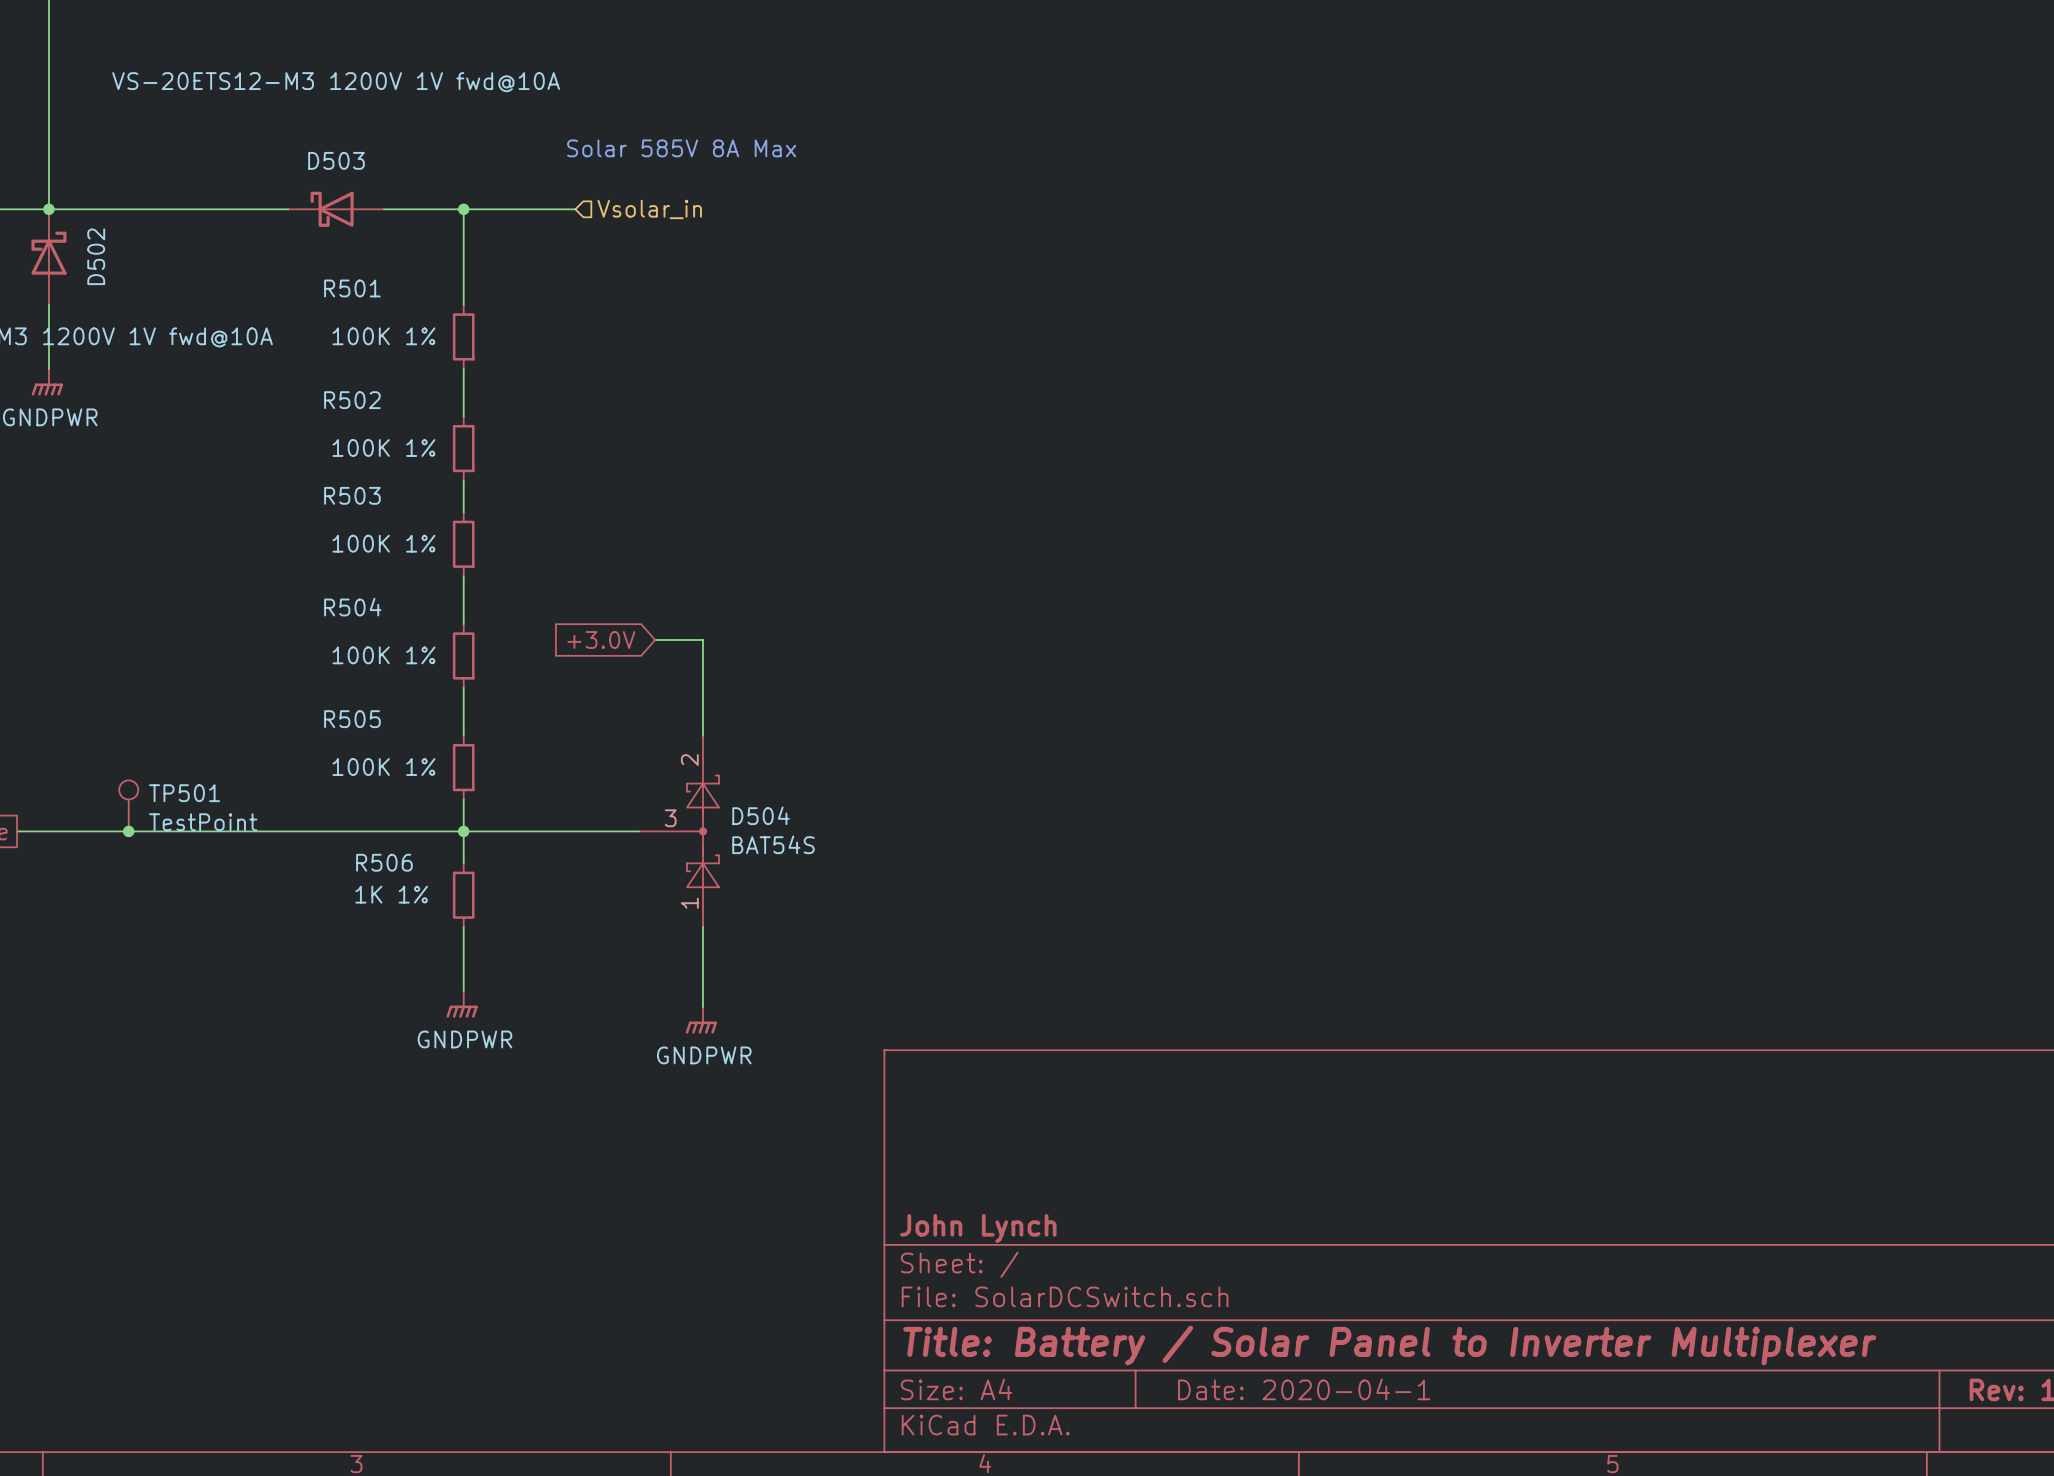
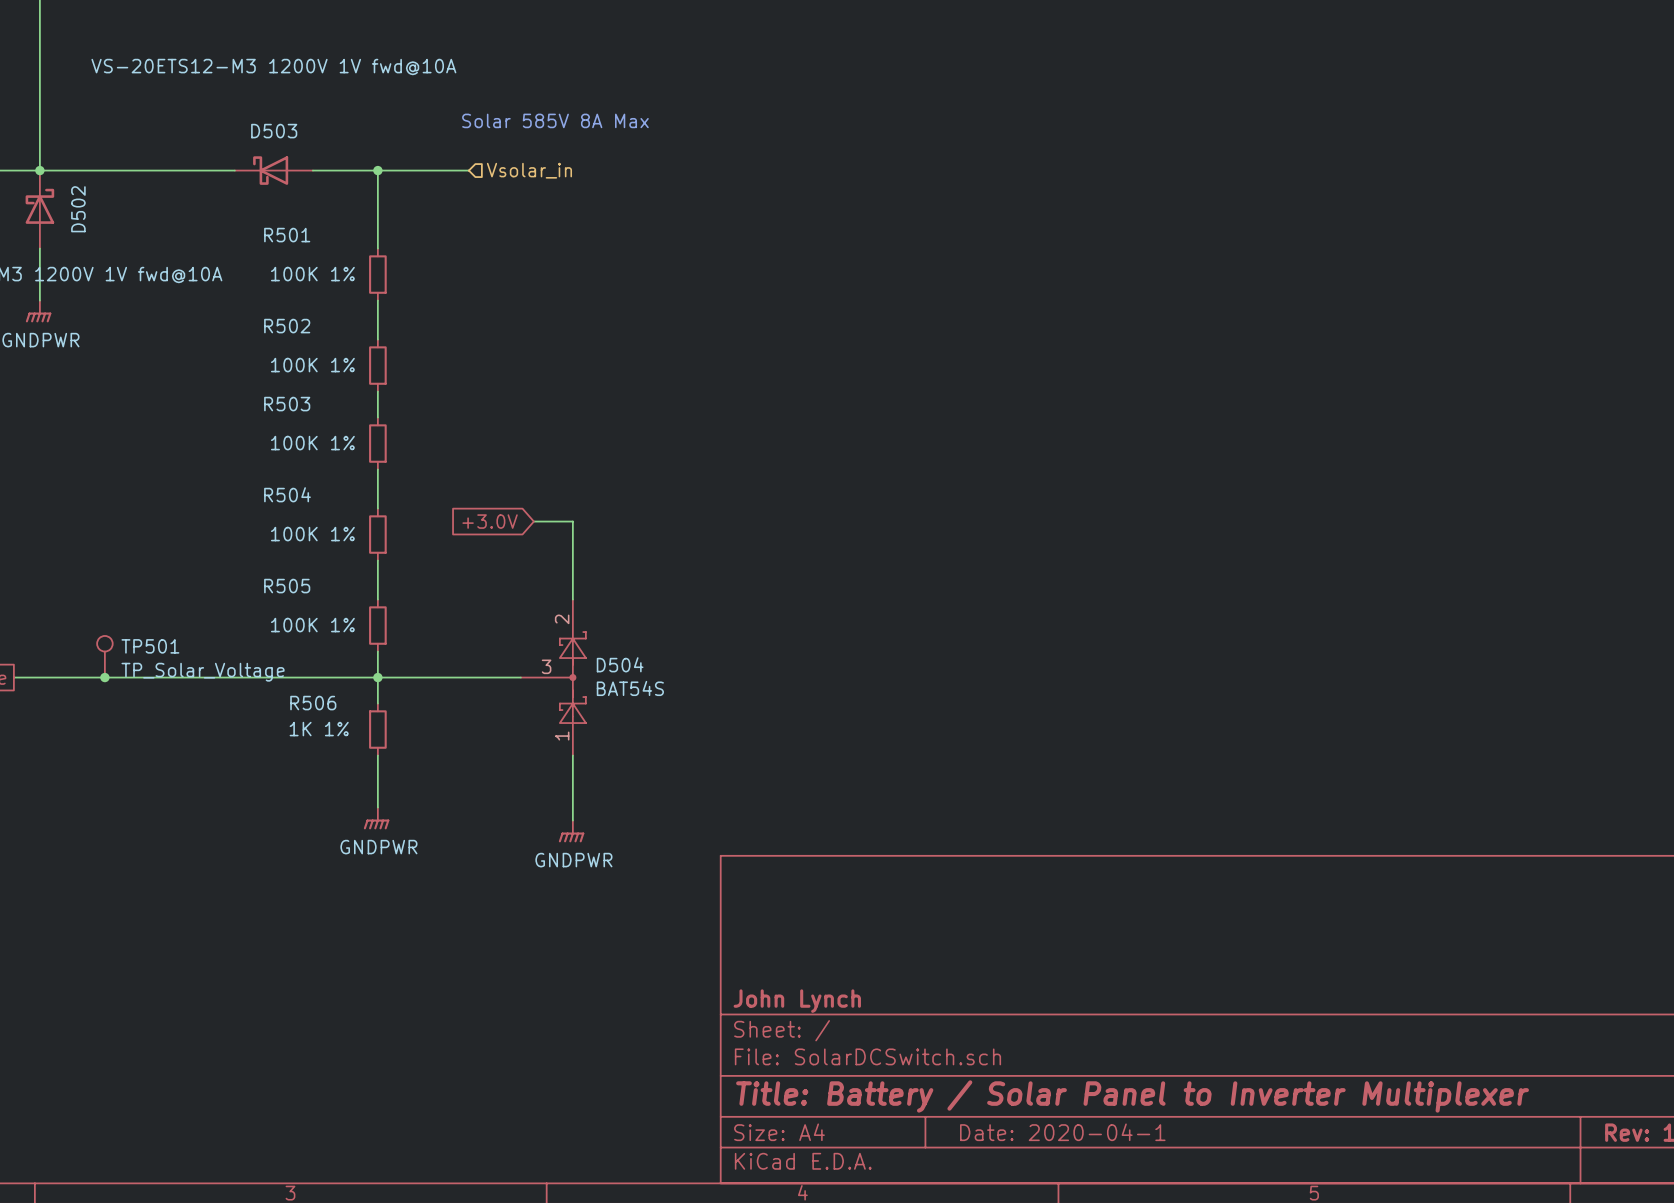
TP501 value: TestPoint (203, 822) -> TP_Solar_Voltage (203, 672)

